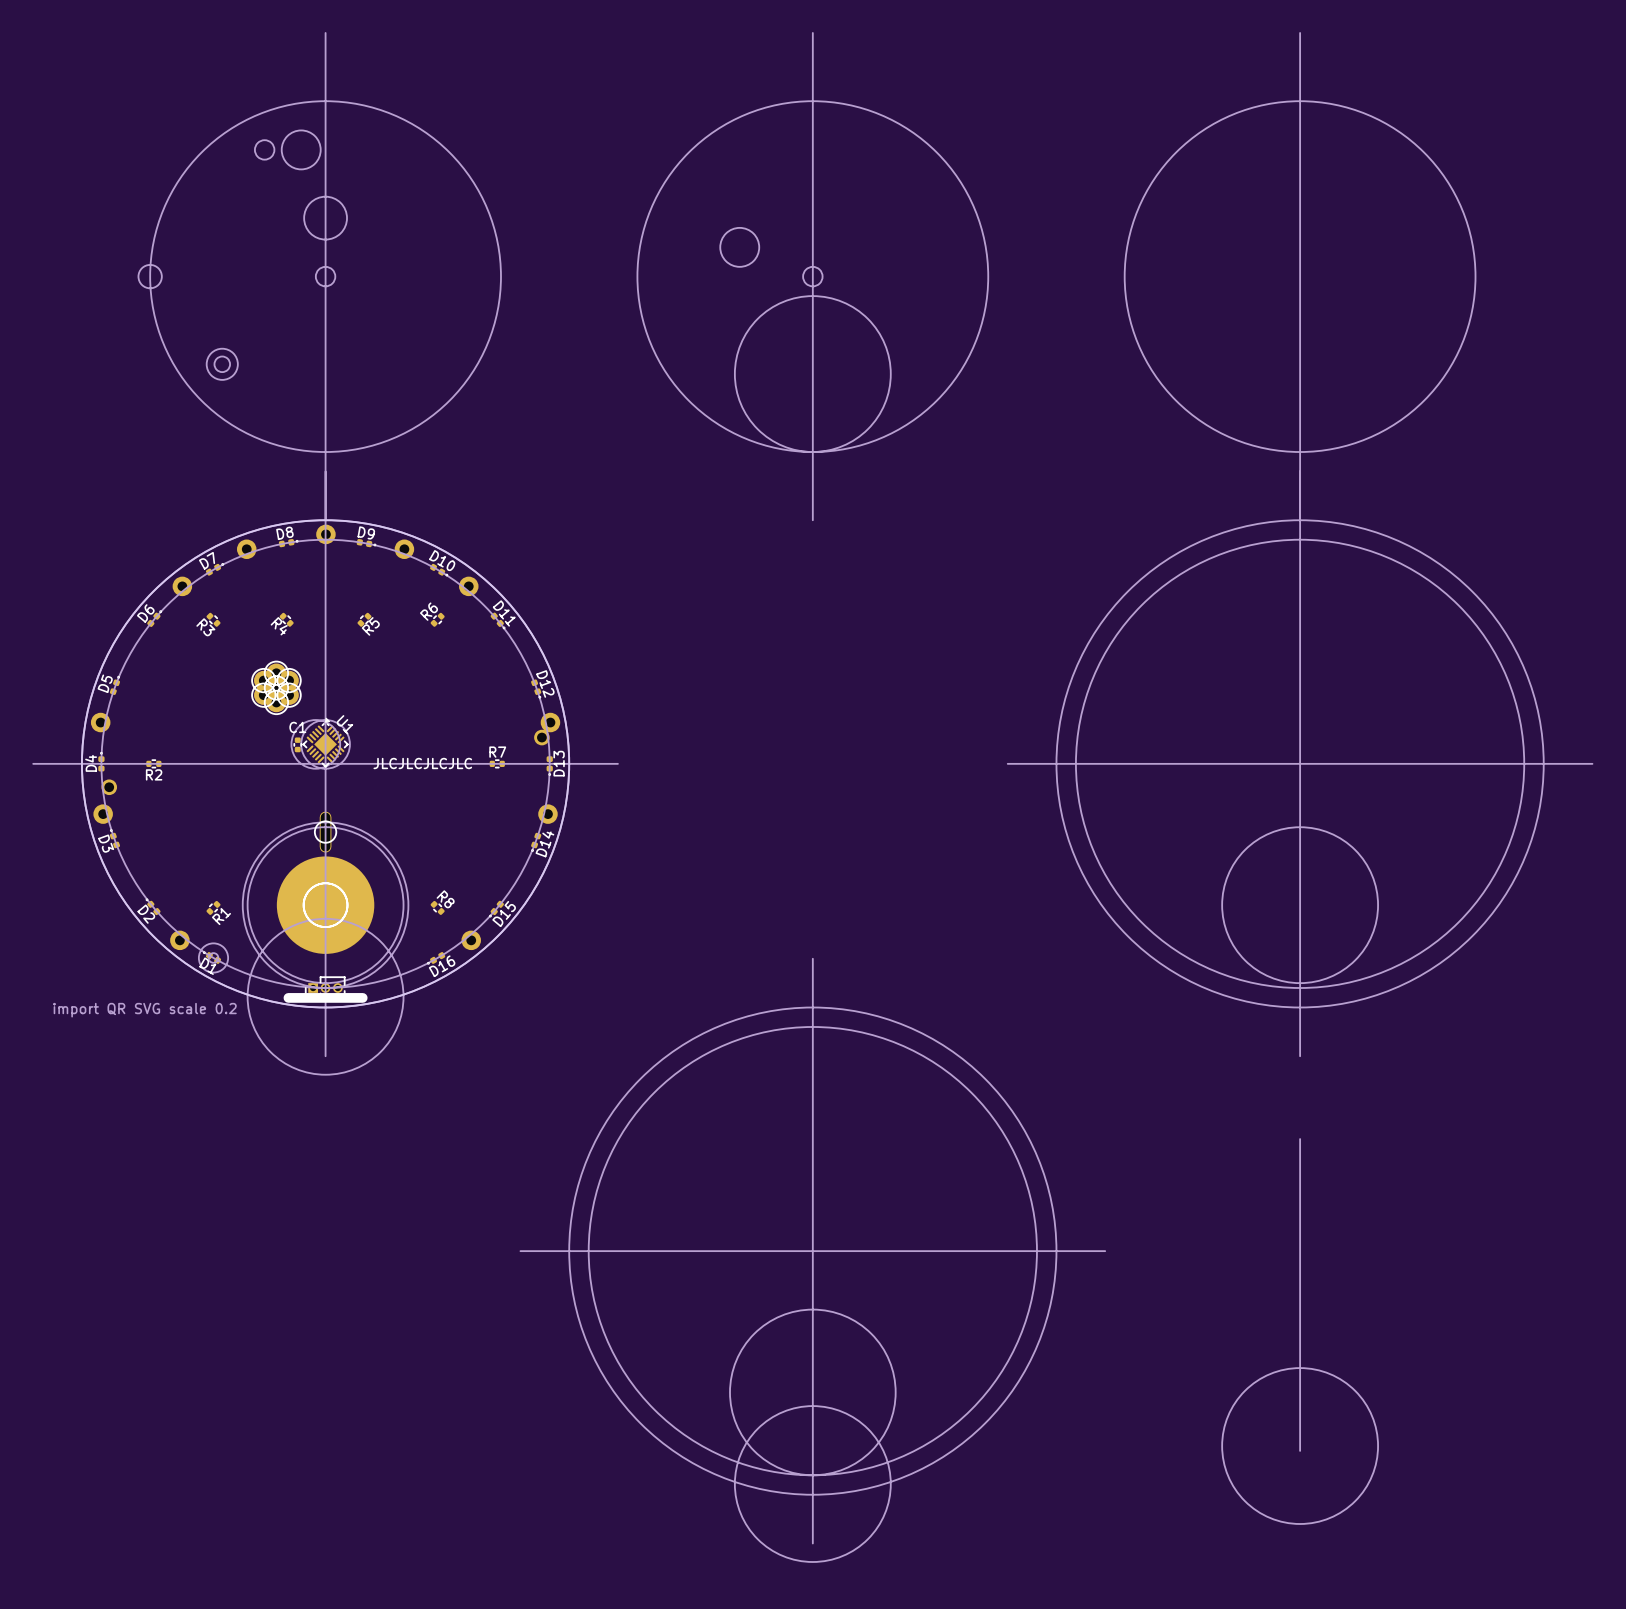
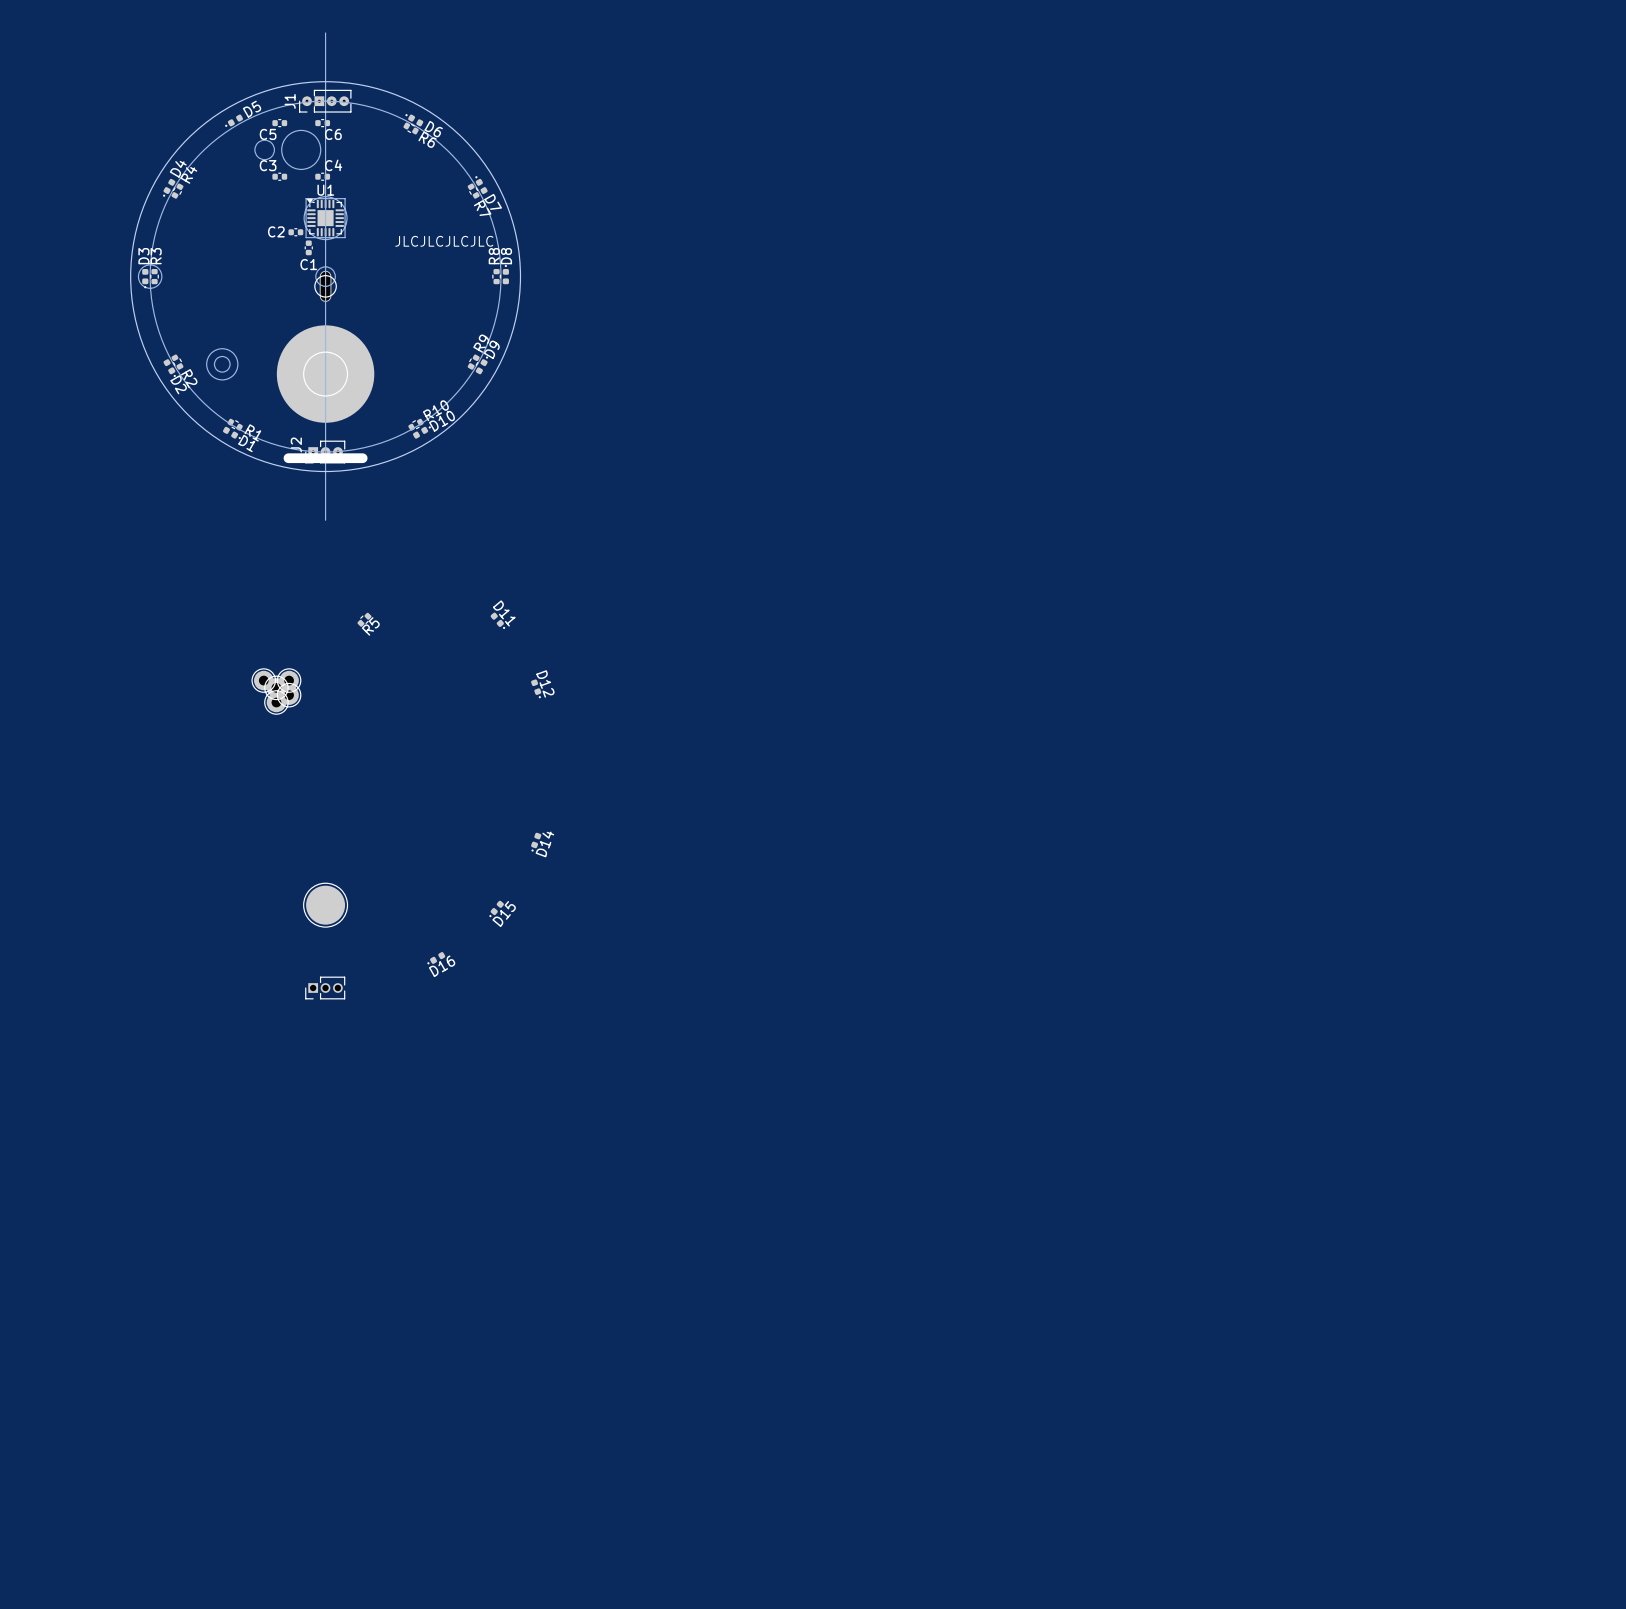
line: (812, 32) (812, 520) -> none
line: (1300, 32) (1300, 520) -> none
round board edge: none -> [130, 81, 521, 472]
drawing: [637, 100, 989, 453] -> none
drawing: [1124, 100, 1476, 453] -> none
J1: none -> (325, 101)
C5: none -> (279, 123)
C6: none -> (322, 123)
C3: none -> (279, 176)
C4: none -> (322, 176)
line: none -> (306, 198) (345, 198) (345, 237) (306, 237) (306, 198)
C2: none -> (295, 232)
text: none -> JLCJLCJLCJLC (444, 241)
part: none -> (325, 286)
R9: none -> (473, 362)
part: none -> (325, 374)
R10: none -> (415, 424)
J2: none -> (325, 452)
line: (325, 471) (325, 1056) -> none
line: (1300, 471) (1300, 1056) -> none
round board edge: [81, 519, 570, 1008] -> none
drawing: [81, 519, 1545, 1563] -> none
part: (325, 534) -> none
D8 rotation: 0° (288, 543) -> 80° counterclockwise (505, 274)
D8 position: (288, 543) -> (505, 274)
D9 rotation: 0° (366, 543) -> 70° counterclockwise (481, 365)
D9 position: (366, 543) -> (481, 365)
part: (246, 549) -> none
part: (404, 549) -> none
D7 name position: D7 (207, 560) -> D7 (493, 201)
D7 rotation: 0° (214, 569) -> 90° counterclockwise (481, 185)
D7 position: (214, 569) -> (481, 185)
D10 rotation: 0° (438, 569) -> 60° counterclockwise (421, 432)
D10 position: (438, 569) -> (421, 432)
part: (182, 586) -> none
part: (468, 586) -> none
R6 name position: R6 (428, 611) -> R6 (427, 139)
D6 name position: D6 (145, 613) -> D6 (433, 129)
D6 rotation: 0° (154, 618) -> 100° counterclockwise (414, 120)
D6 position: (154, 618) -> (414, 120)
R3 rotation: 0° (213, 619) -> 45° clockwise (154, 276)
R3 position: (213, 619) -> (154, 276)
R4 rotation: 0° (286, 619) -> 75° clockwise (177, 191)
R4 position: (286, 619) -> (177, 191)
R6 rotation: 0° (437, 619) -> 75° clockwise (411, 128)
R6 position: (437, 619) -> (411, 128)
R4 name position: R4 (279, 626) -> R4 (188, 175)
R3 name position: R3 (205, 627) -> R3 (156, 256)
part: (276, 673) -> none
D5 name position: D5 (105, 683) -> D5 (252, 109)
D5 rotation: 0° (114, 685) -> 140° counterclockwise (234, 120)
D5 position: (114, 685) -> (234, 120)
part: (263, 695) -> none
part: (100, 722) -> none
part: (550, 722) -> none
C1 name position: C1 (297, 727) -> C1 (308, 264)
part: (541, 737) -> none
U1 rotation: 0° (325, 742) -> 45° counterclockwise (325, 217)
U1 position: (325, 742) -> (325, 217)
C1 position: (297, 744) -> (308, 247)
R7 name position: R7 (497, 752) -> R7 (482, 207)
D4 rotation: 0° (101, 761) -> 150° counterclockwise (169, 187)
D4 position: (101, 761) -> (169, 187)
line: (33, 763) (617, 763) -> none
D4 name position: D4 (91, 763) -> D4 (178, 169)
R2 rotation: 0° (153, 763) -> 60° clockwise (177, 362)
R2 position: (153, 763) -> (177, 362)
text: JLCJLCJLCJLC (422, 763) -> none
R7 rotation: 0° (497, 763) -> 60° clockwise (473, 191)
R7 position: (497, 763) -> (473, 191)
line: (1007, 763) (1592, 763) -> none
D13: (549, 765) -> none
part: (109, 787) -> none
part: (103, 814) -> none
part: (547, 814) -> none
part: (325, 832) -> none
D3 rotation: 0° (114, 838) -> 160° counterclockwise (145, 278)
D3 position: (114, 838) -> (145, 278)
D3 name position: D3 (106, 843) -> D3 (143, 256)
part: (325, 905) -> none
D2 rotation: 0° (153, 907) -> 170° counterclockwise (169, 368)
D2 position: (153, 907) -> (169, 368)
R1 rotation: 0° (213, 907) -> 75° clockwise (235, 424)
R1 position: (213, 907) -> (235, 424)
R8 rotation: 0° (437, 907) -> 45° clockwise (496, 276)
R8 position: (437, 907) -> (496, 276)
D2 name position: D2 (146, 914) -> D2 (178, 384)
part: (179, 940) -> none
part: (471, 940) -> none
D1 rotation: 0° (212, 957) -> 180° (231, 432)
D1 position: (212, 957) -> (231, 432)
line: (812, 958) (812, 1543) -> none
D1 name position: D1 (207, 966) -> D1 (246, 443)
text: import QR SVG scale 0.2 (144, 1010) -> none
line: (1300, 1139) (1300, 1450) -> none
line: (520, 1251) (1105, 1251) -> none
drawing: [1221, 1367, 1379, 1525] -> none

